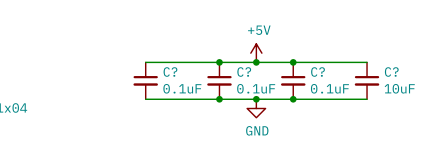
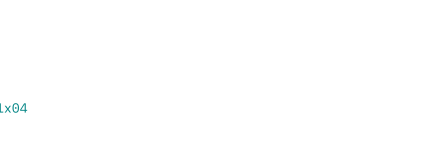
power symbol: +5V (256, 53) -> none
wire: (145, 62) (367, 62) -> none
junction: (219, 62) -> none
junction: (256, 62) -> none
junction: (293, 62) -> none
C?: 0.1uF (145, 80) -> none
C?: 0.1uF (219, 80) -> none
C?: 0.1uF (293, 80) -> none
C?: 10uF (367, 80) -> none
wire: (145, 99) (367, 99) -> none
junction: (219, 99) -> none
junction: (256, 99) -> none
junction: (293, 99) -> none
power symbol: GND (256, 108) -> none

